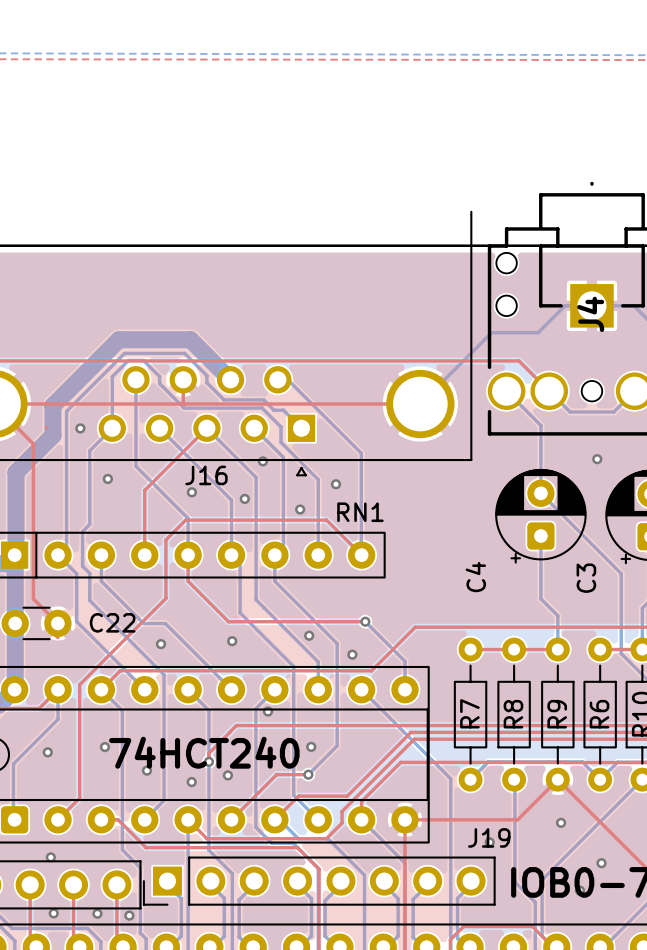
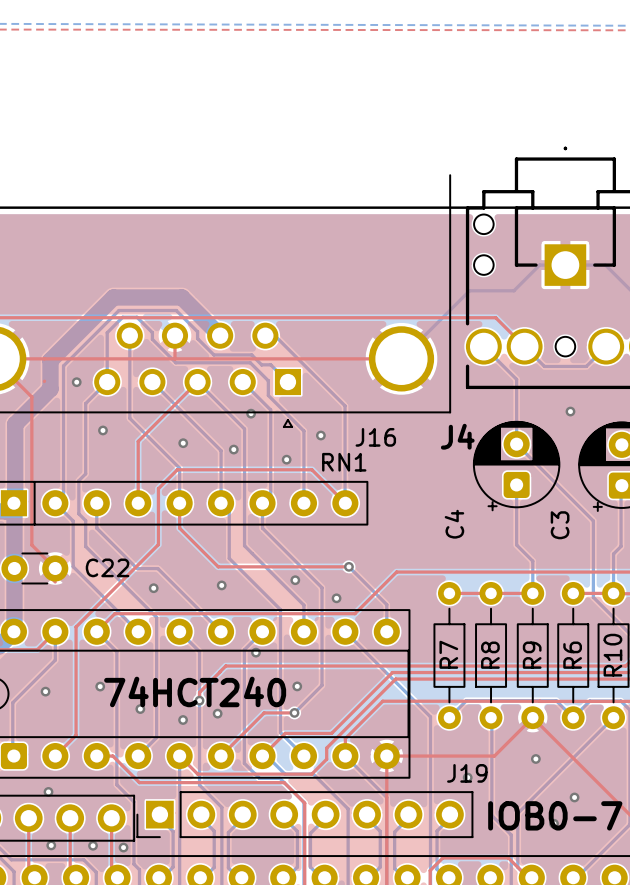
J4 name rotation: 0° (590, 314) -> 90° clockwise (457, 436)
J4 name position: J4 (590, 314) -> J4 (457, 436)
J16 name position: J16 (206, 475) -> J16 (375, 437)

